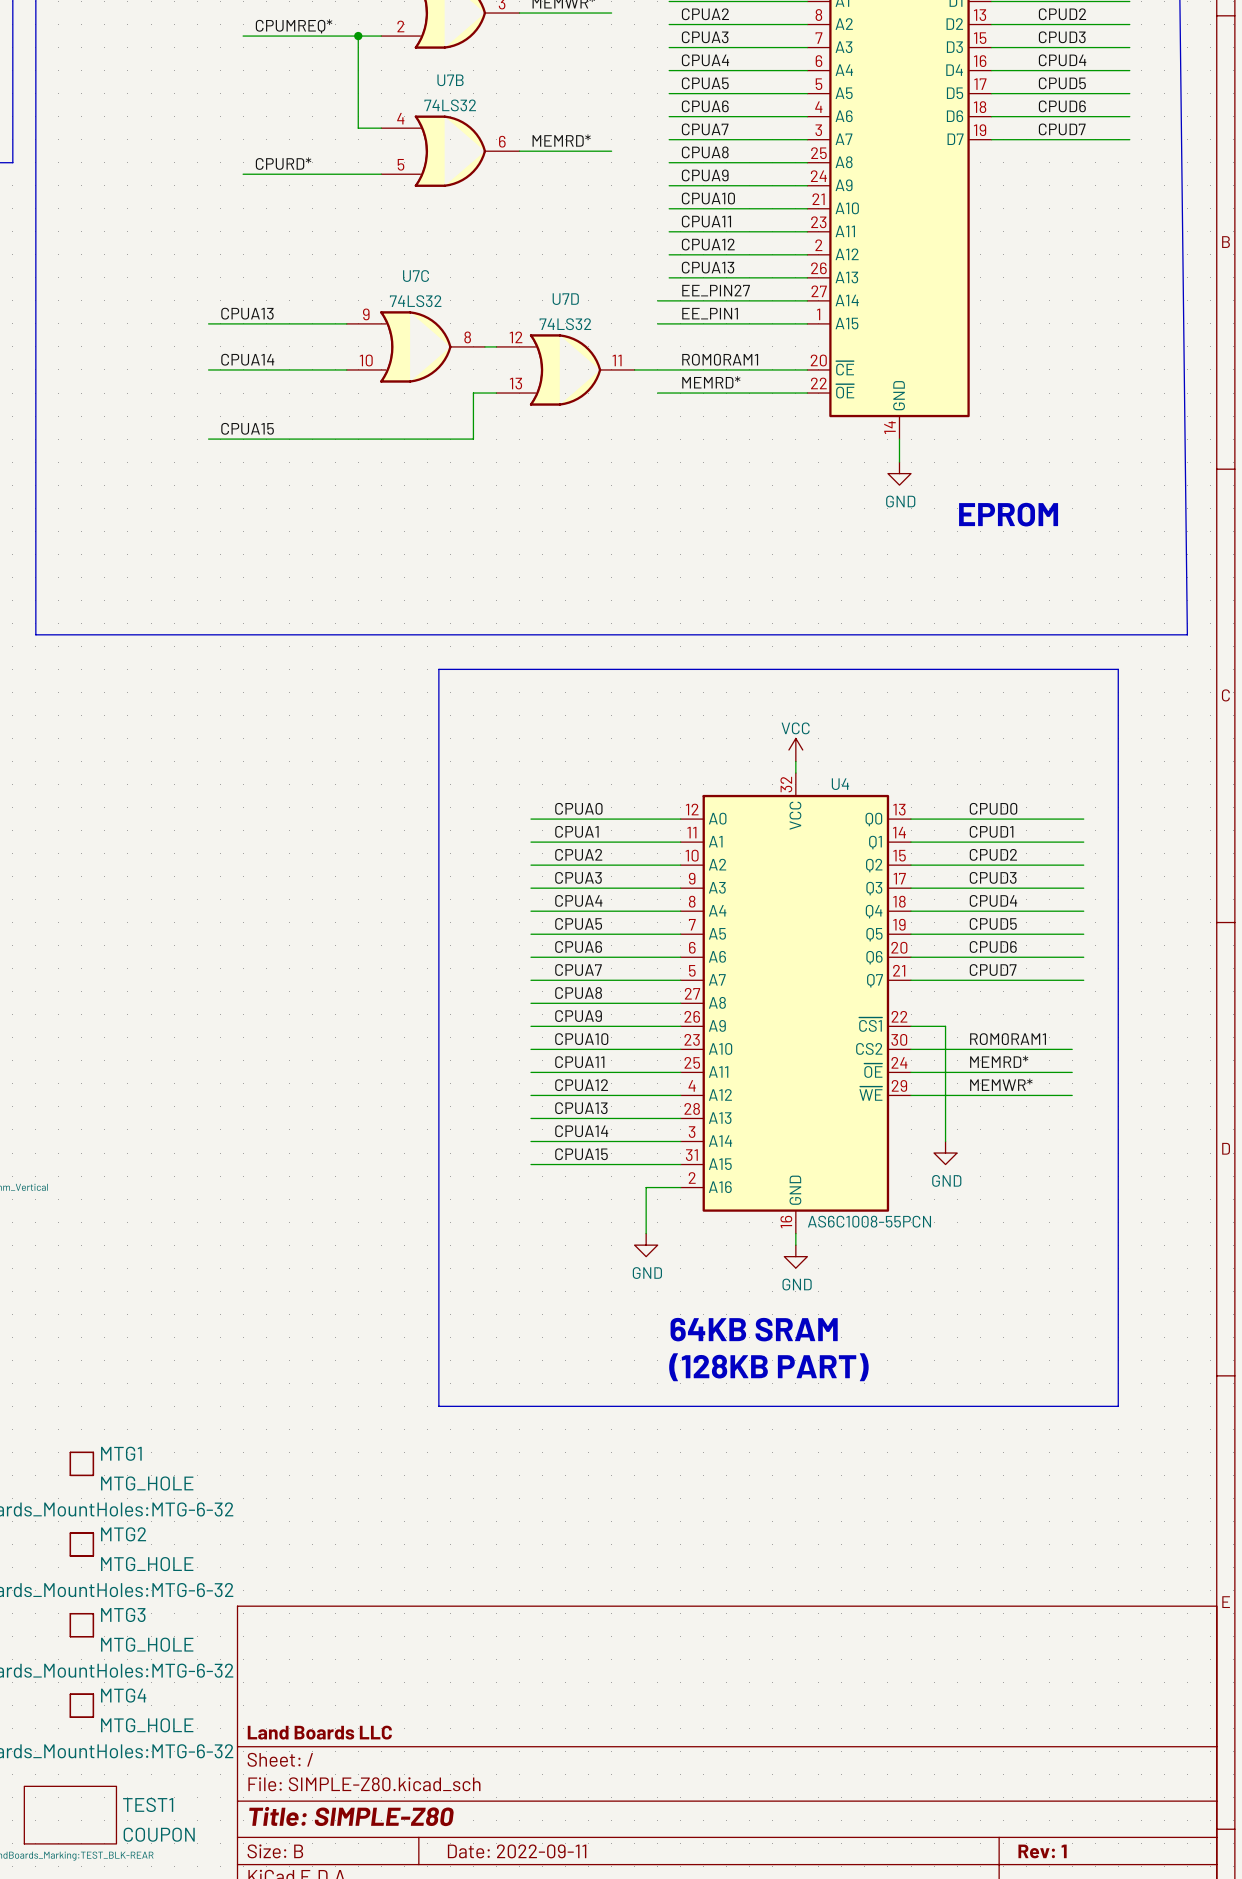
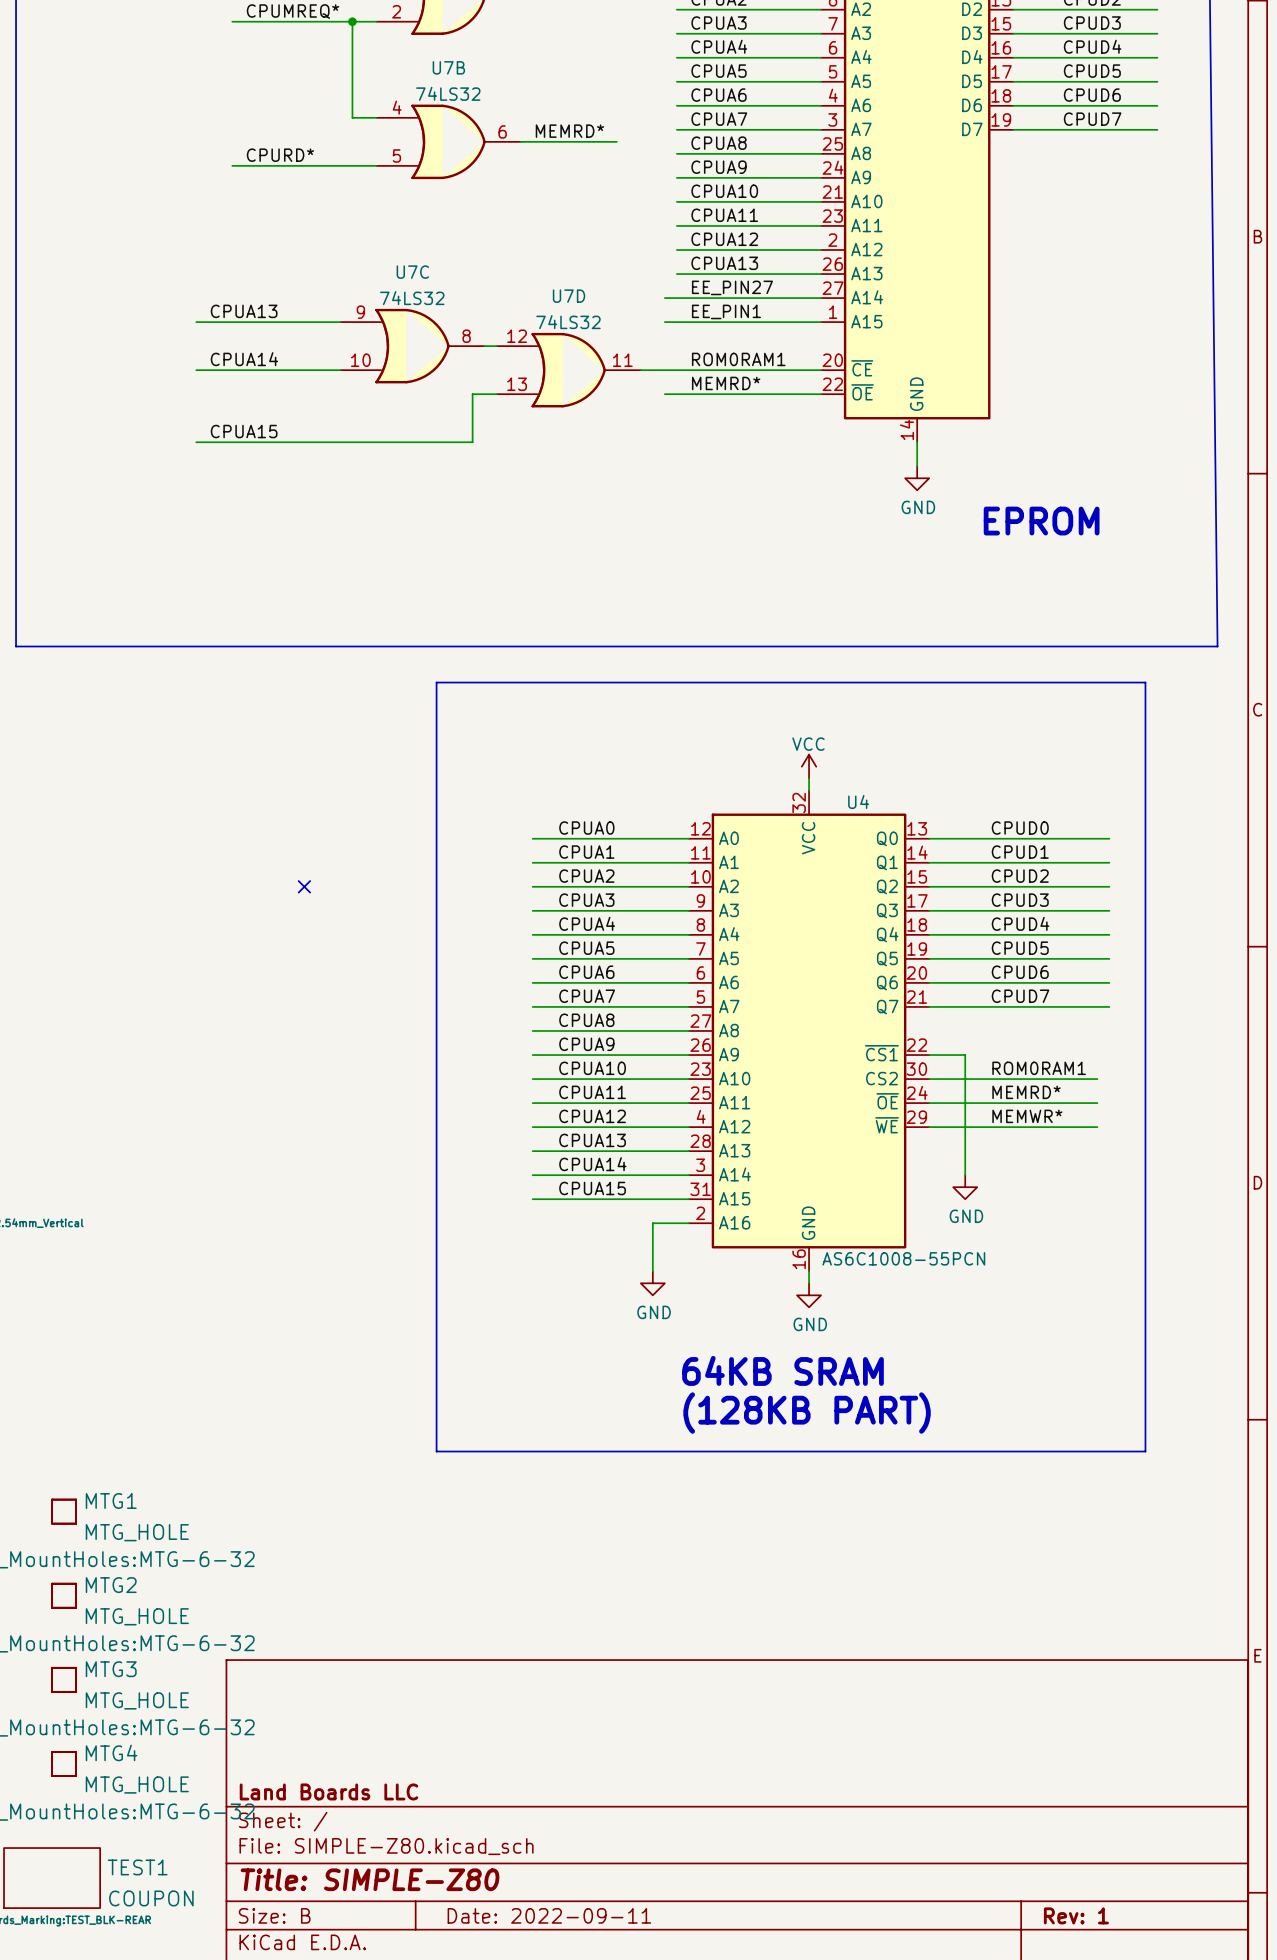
no-connect mark: none -> (304, 886)

